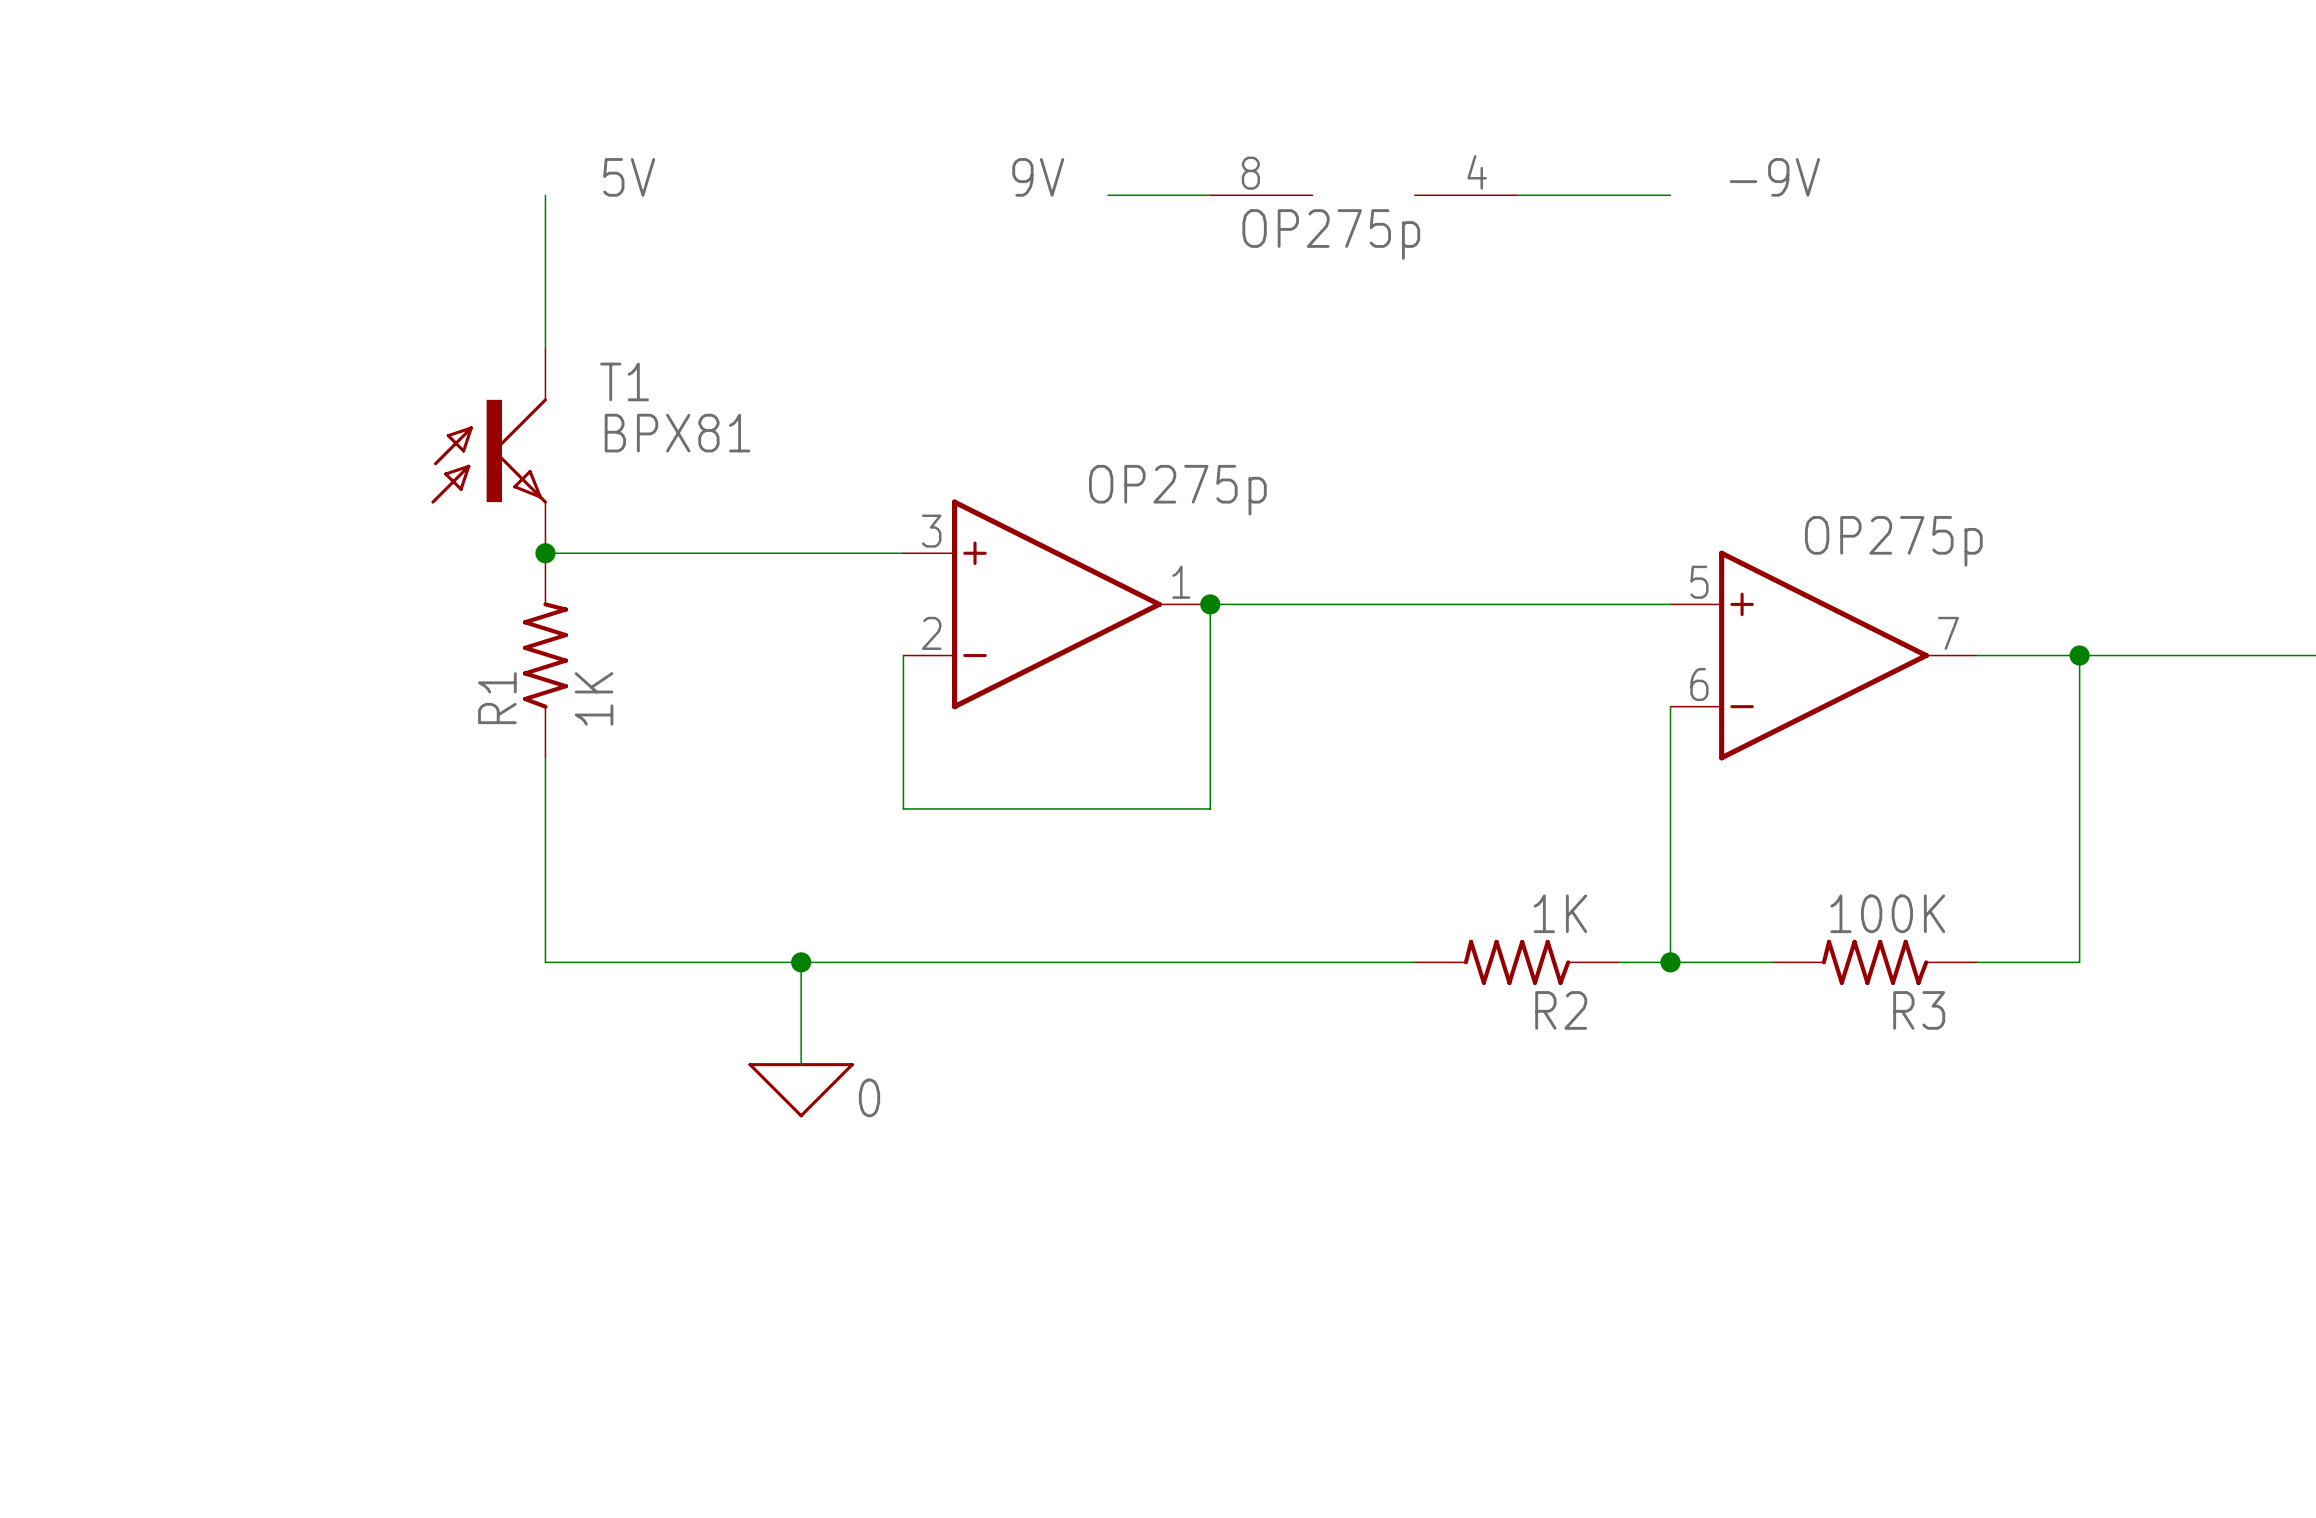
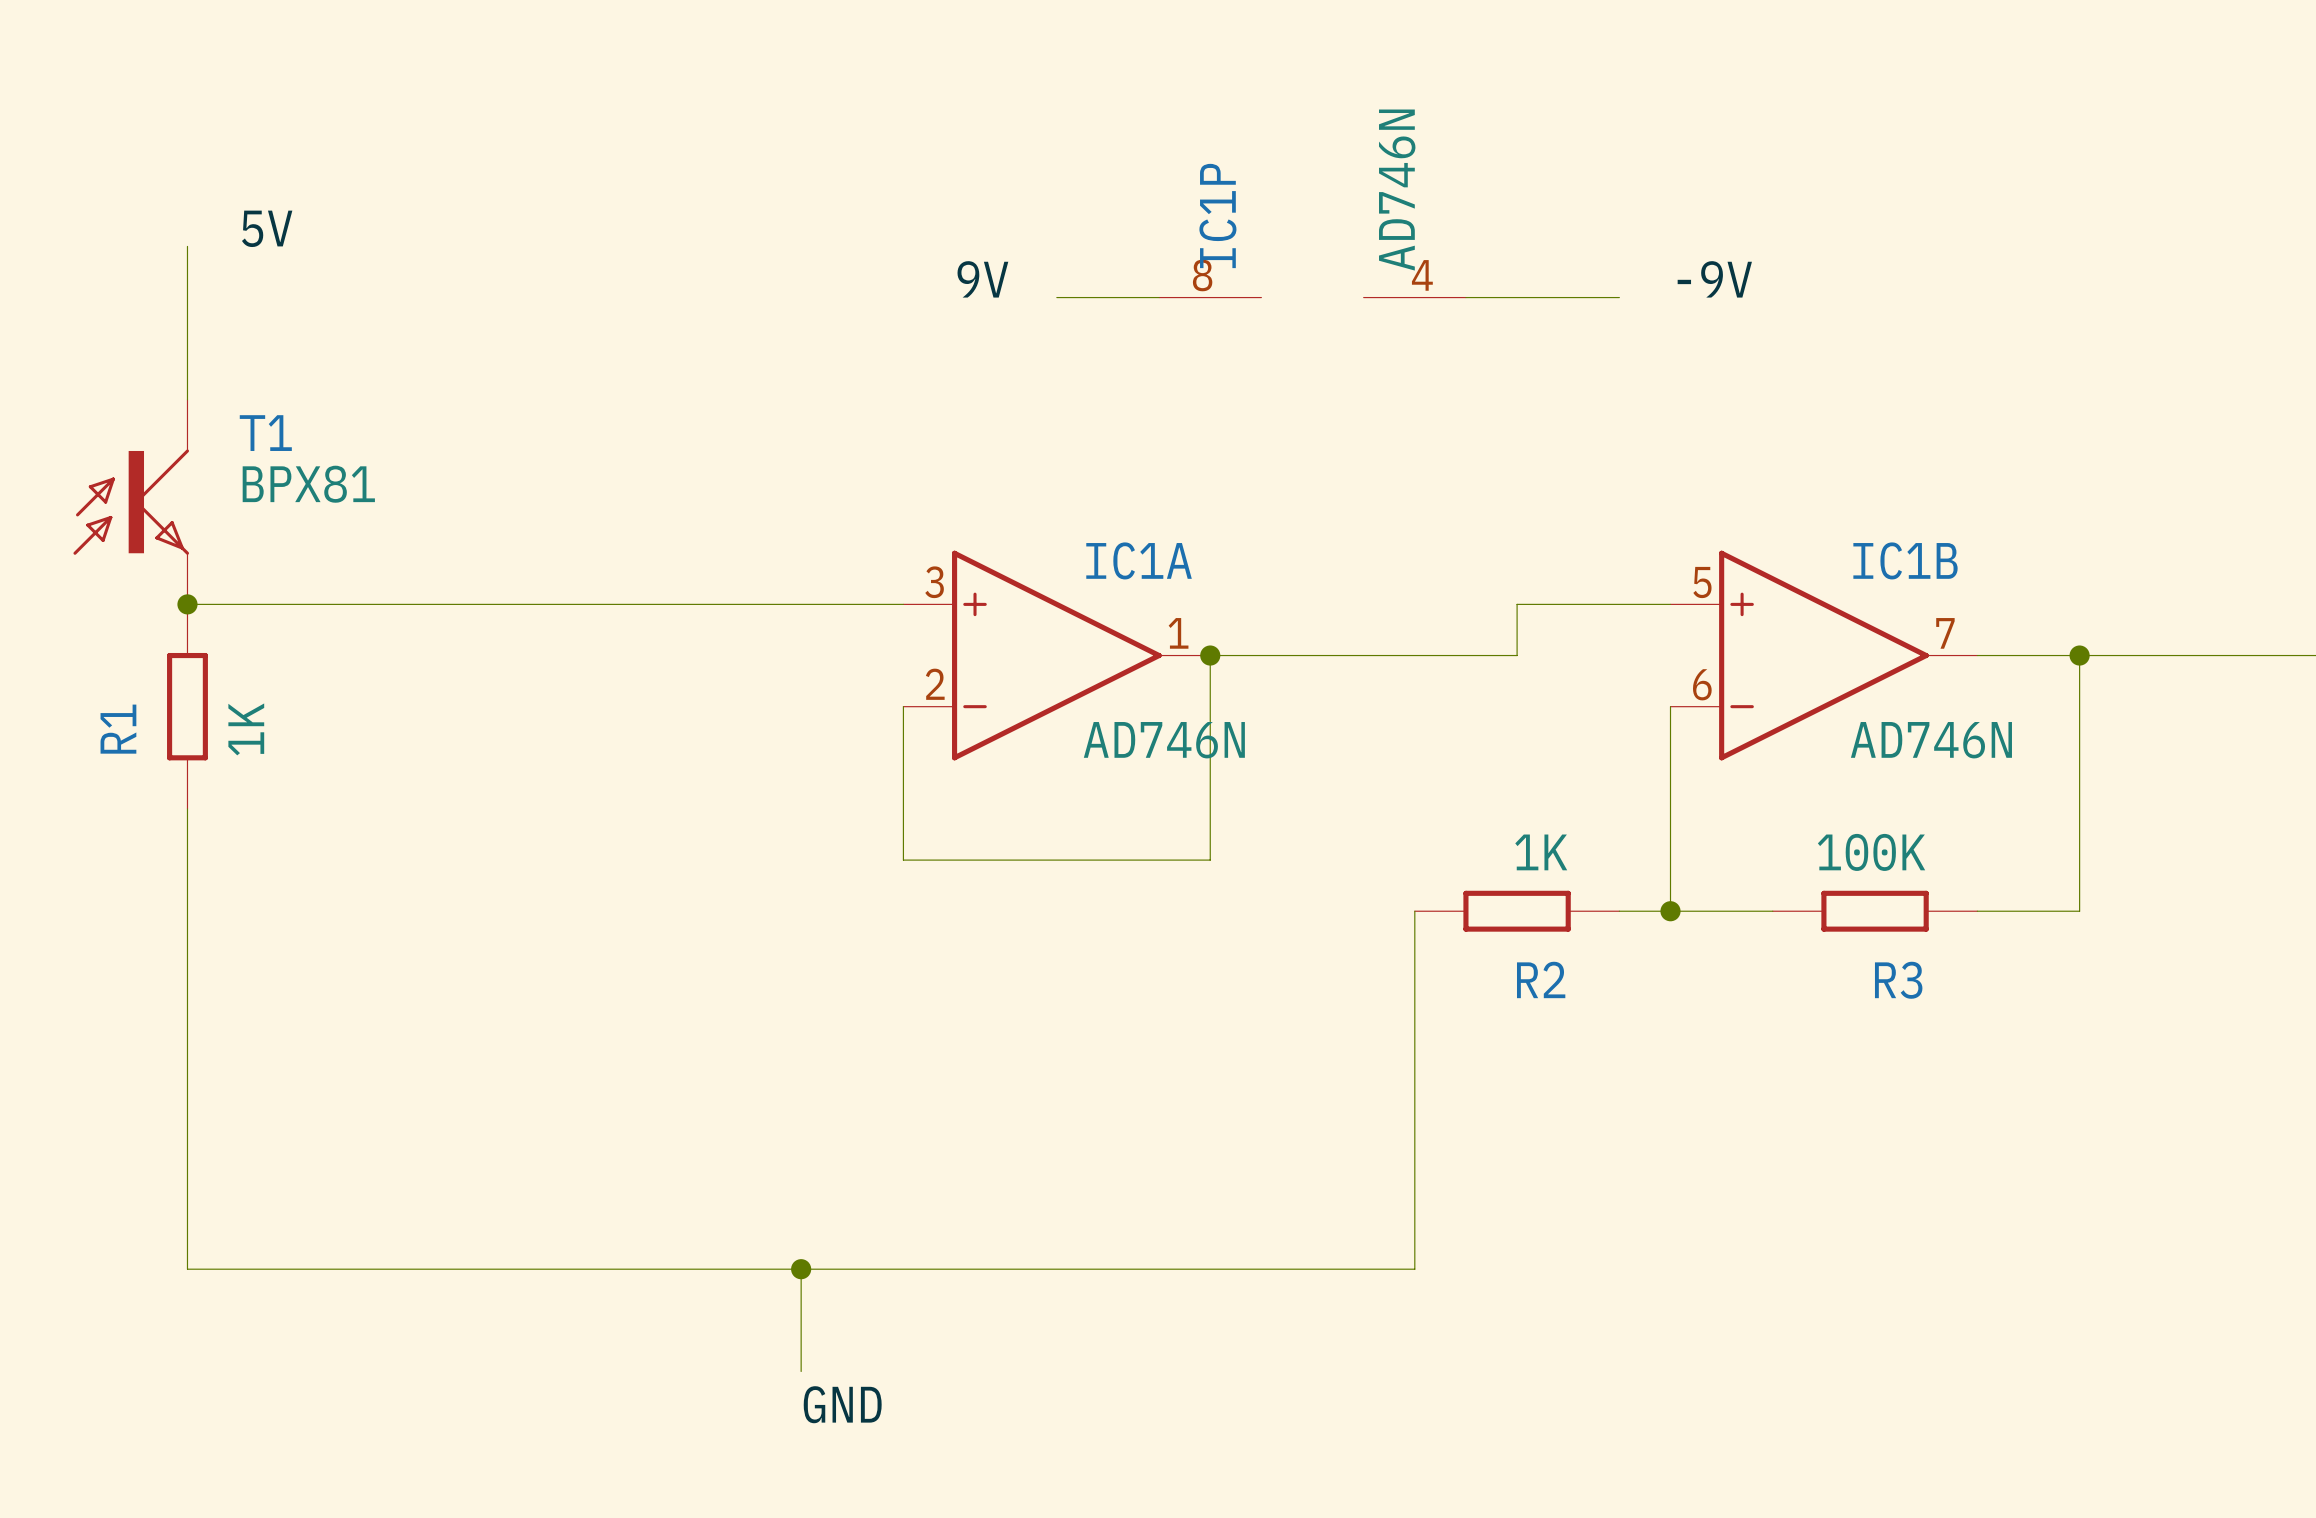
label position: 5V (629, 177) -> 5V (267, 228)
label position: 9V (1038, 177) -> 9V (982, 279)
label position: -9V (1774, 177) -> -9V (1714, 279)
wire: (545, 195) (545, 348) -> (187, 246) (187, 399)
wire: (1107, 195) (1210, 195) -> (1056, 297) (1159, 297)
part: OP275p (1363, 195) -> none
wire: (1517, 195) (1670, 195) -> (1465, 297) (1619, 297)
IC1P: none -> AD746N (1312, 297)
T1 position: (489, 450) -> (131, 502)
IC1B value: OP275p (1893, 541) -> AD746N (1931, 740)
R1 symbol: [522, 553, 568, 758] -> [167, 604, 208, 809]
wire: (545, 553) (903, 553) -> none
junction: (545, 553) -> none
IC1B name: none -> IC1B (1905, 560)
wire: none -> (187, 604) (903, 604)
junction: none -> (187, 604)
part: OP275p (1056, 604) -> none
junction position: (1210, 604) -> (1210, 655)
wire: (1517, 604) (1210, 604) (1210, 655) -> (1517, 604) (1517, 655) (1210, 655)
wire: (903, 655) (903, 706) -> none
IC1A: none -> AD746N (1056, 655)
wire: (545, 757) (545, 962) (1414, 962) -> none
wire: none -> (187, 808) (187, 1269) (1414, 1269) (1414, 911)
wire: (903, 808) (1210, 808) -> (903, 808) (903, 860) (1210, 860) (1210, 808)
wire: (1670, 911) (1670, 962) -> none
wire: (2079, 911) (2079, 962) (1977, 962) -> (2079, 911) (1977, 911)
R2 symbol: [1414, 939, 1620, 985] -> [1414, 890, 1620, 932]
R3 symbol: [1772, 939, 1978, 985] -> [1772, 890, 1978, 932]
wire: (801, 962) (801, 1064) -> (801, 1269) (801, 1371)
junction: (801, 962) -> none
wire: (1619, 962) (1772, 962) -> (1619, 911) (1772, 911)
junction position: (1670, 962) -> (1670, 911)
power symbol: (801, 1090) -> none
label: 0 (869, 1097) -> none
junction: none -> (801, 1269)
label: none -> GND (842, 1404)

